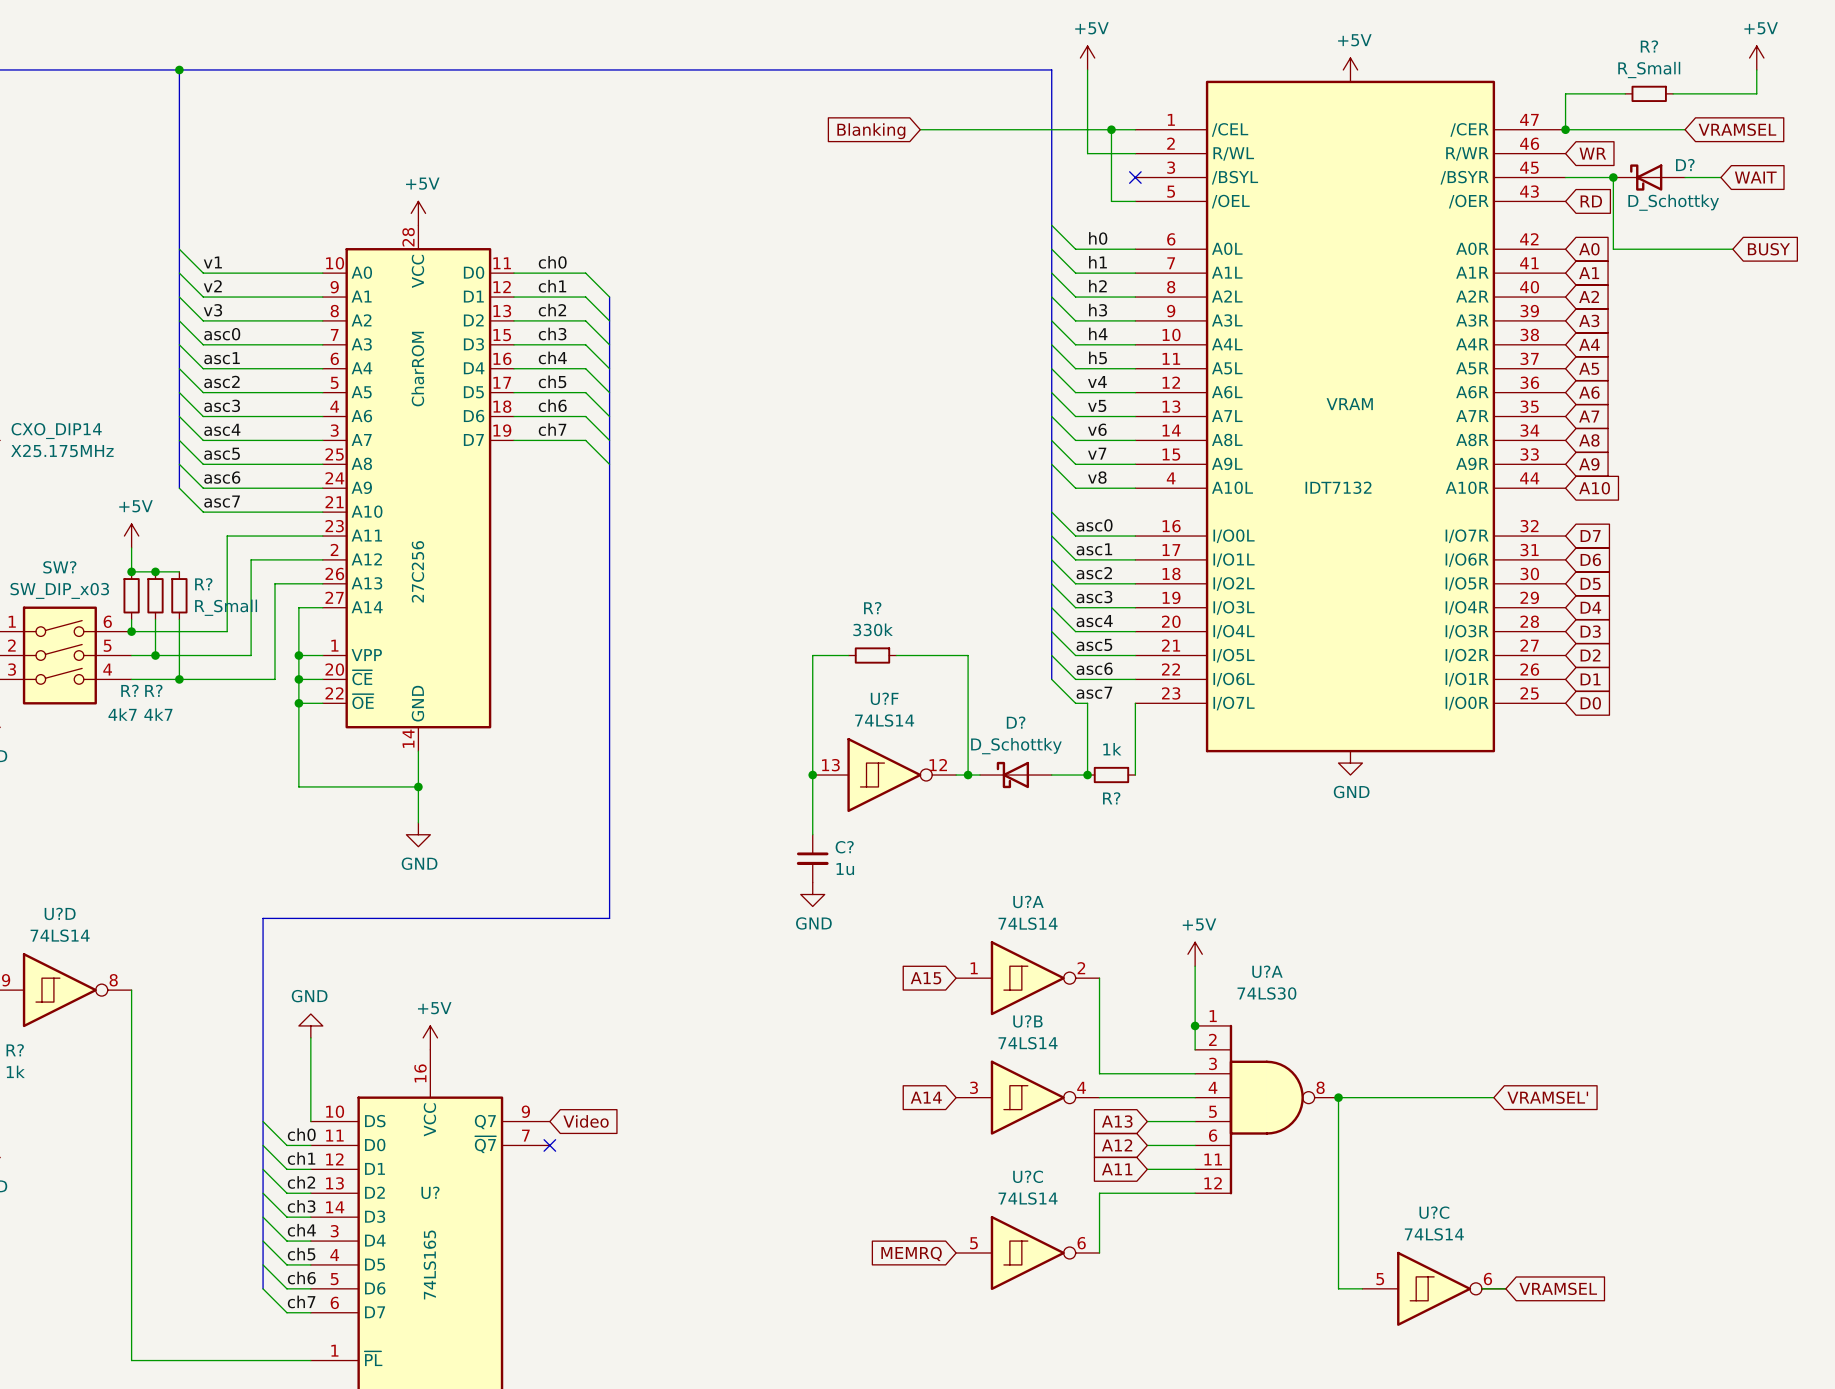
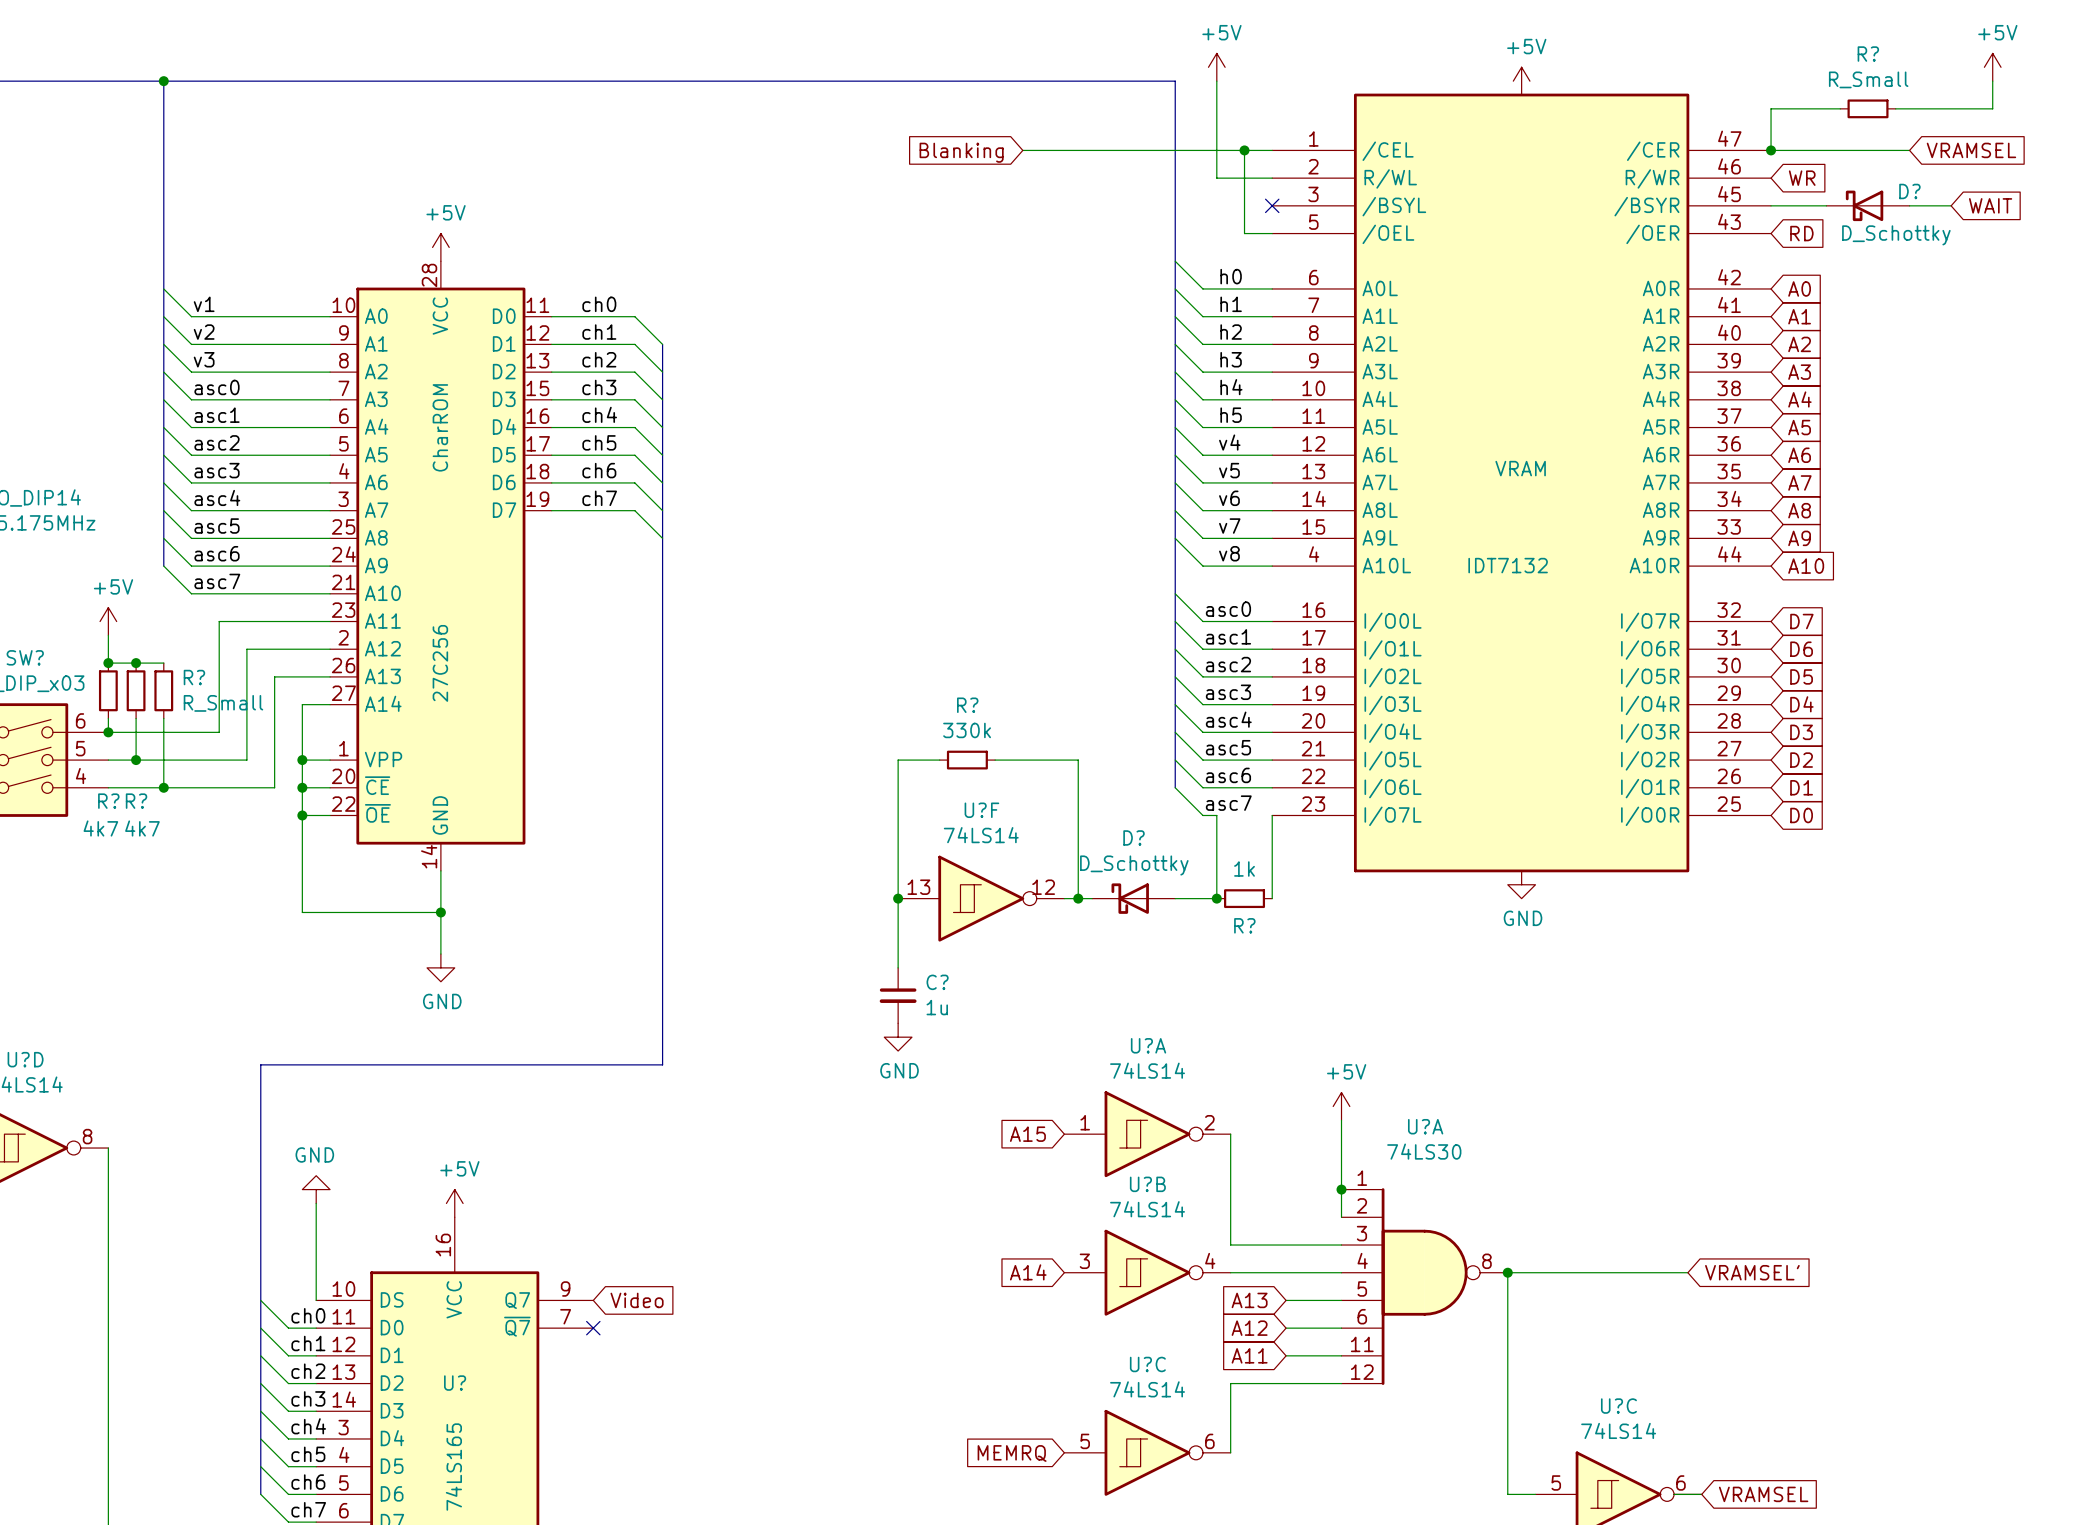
wire: (1613, 177) (1613, 249) (1732, 249) -> none
junction: (1613, 177) -> none
global label: BUSY (1768, 249) -> none

